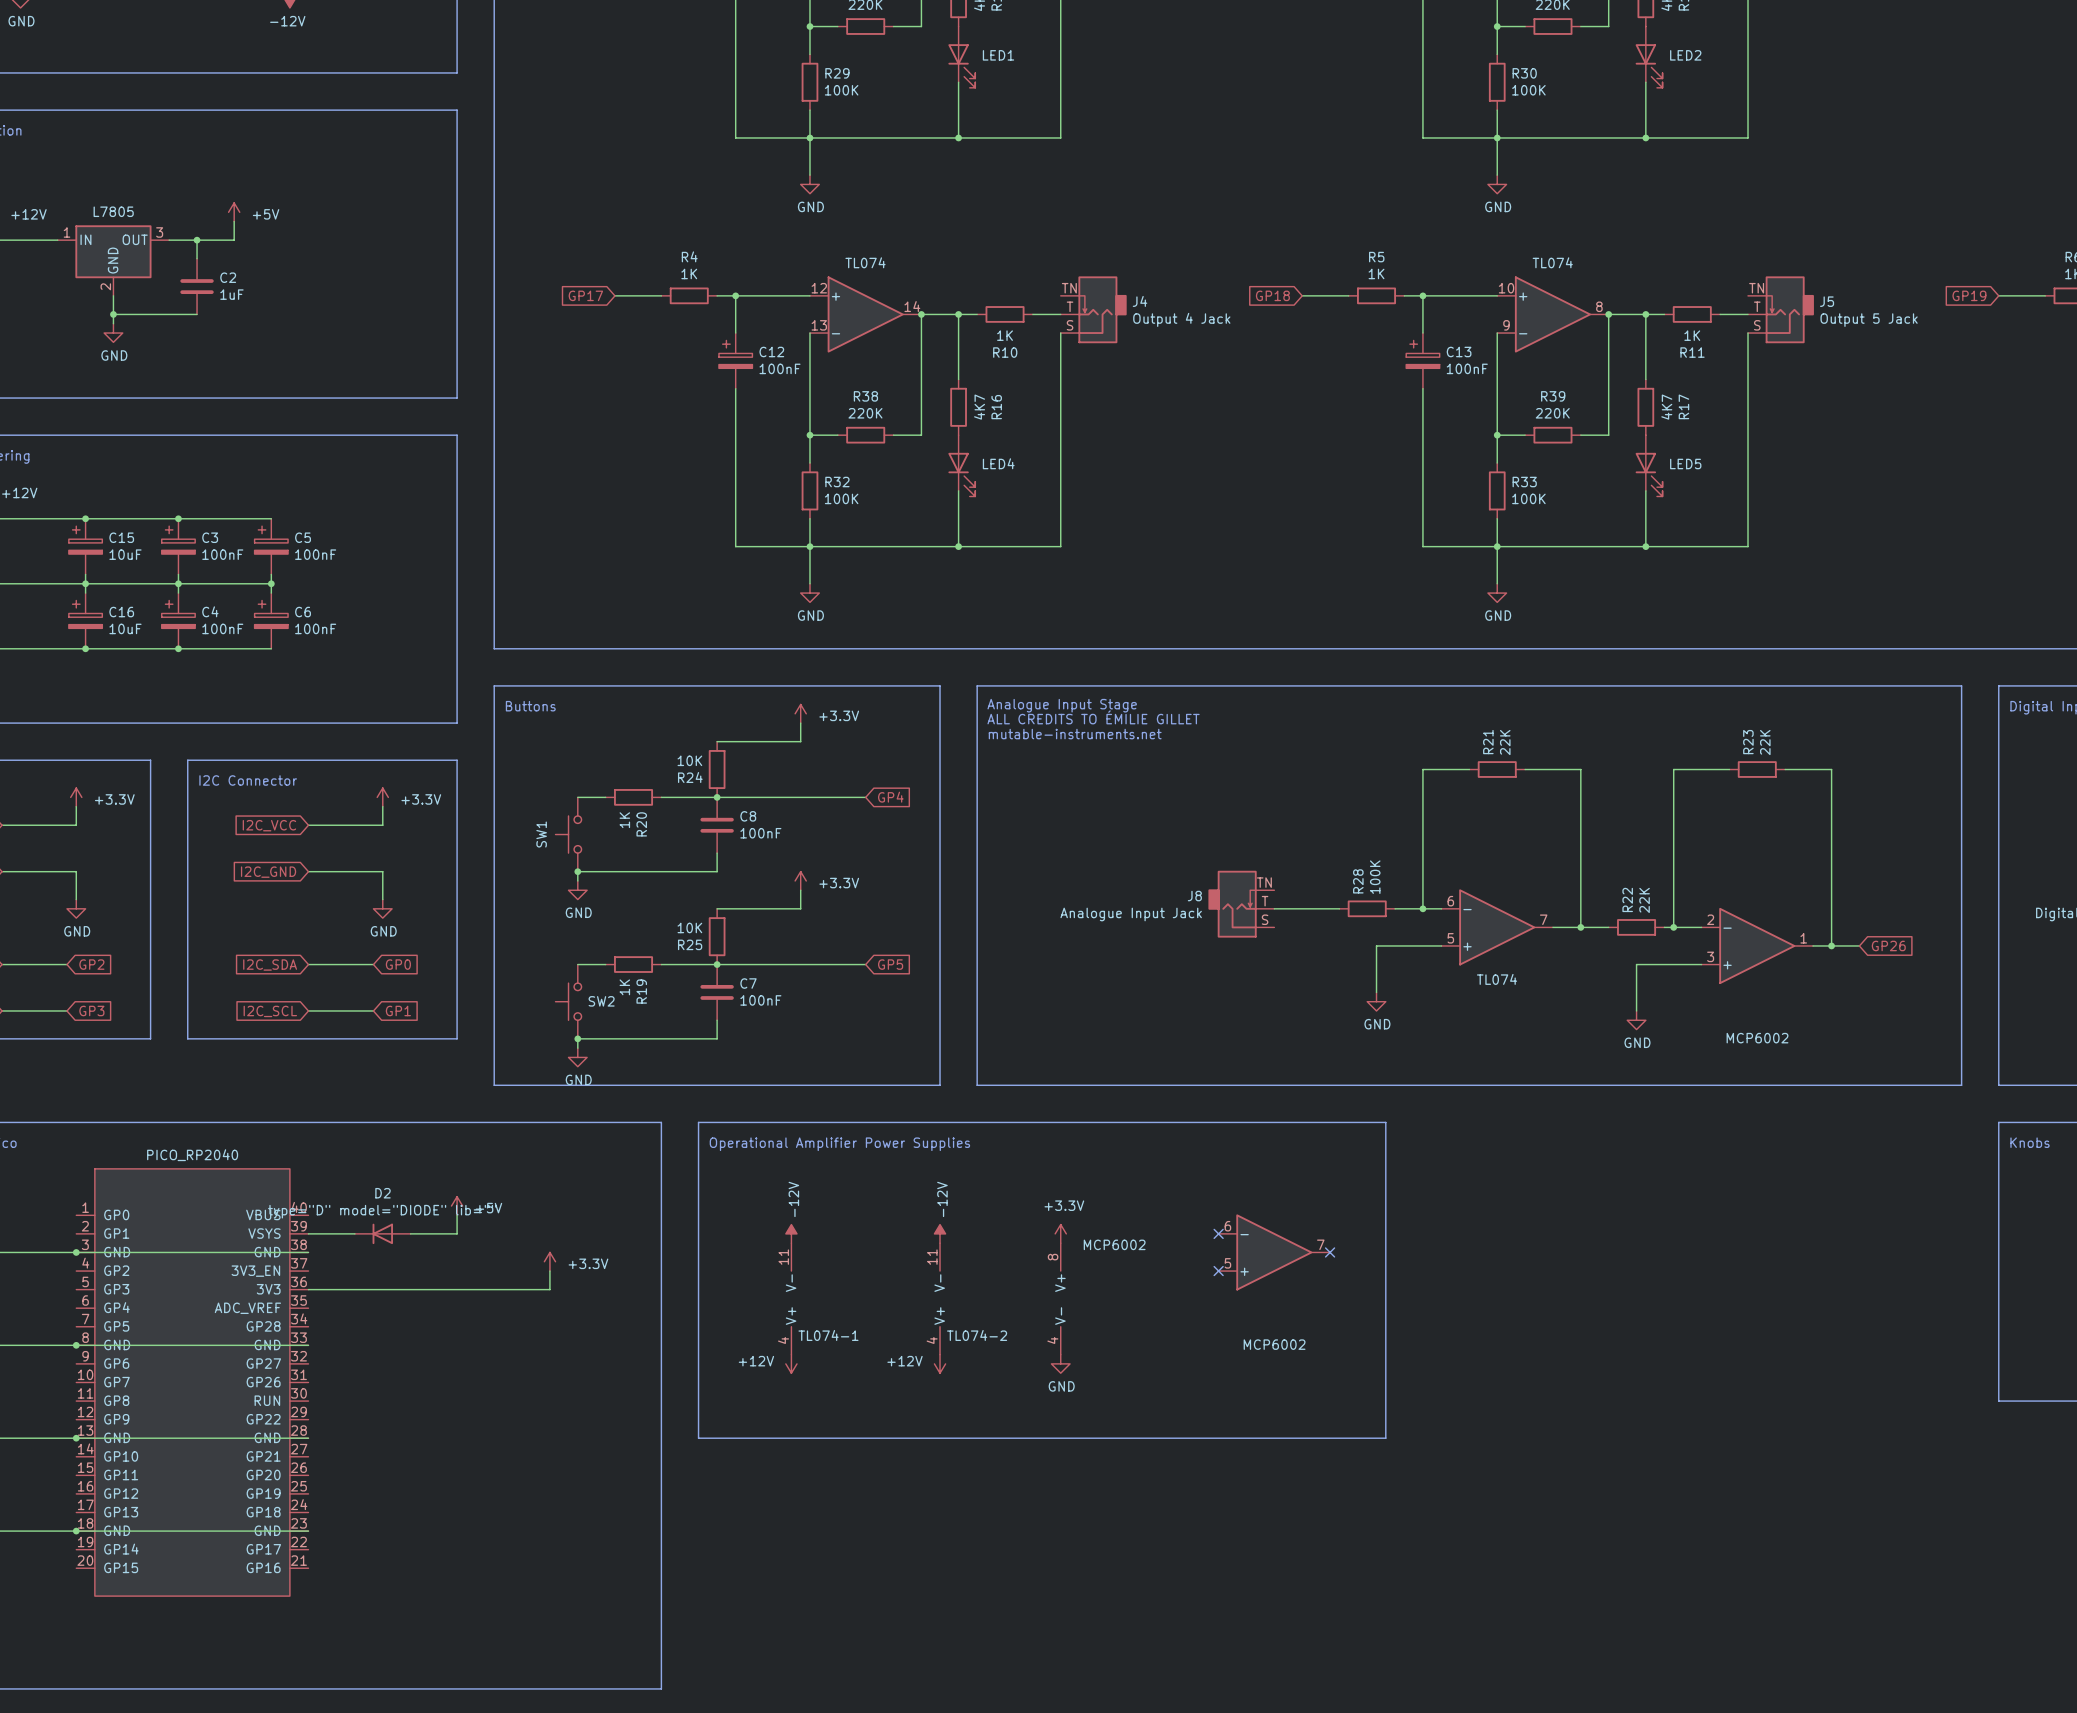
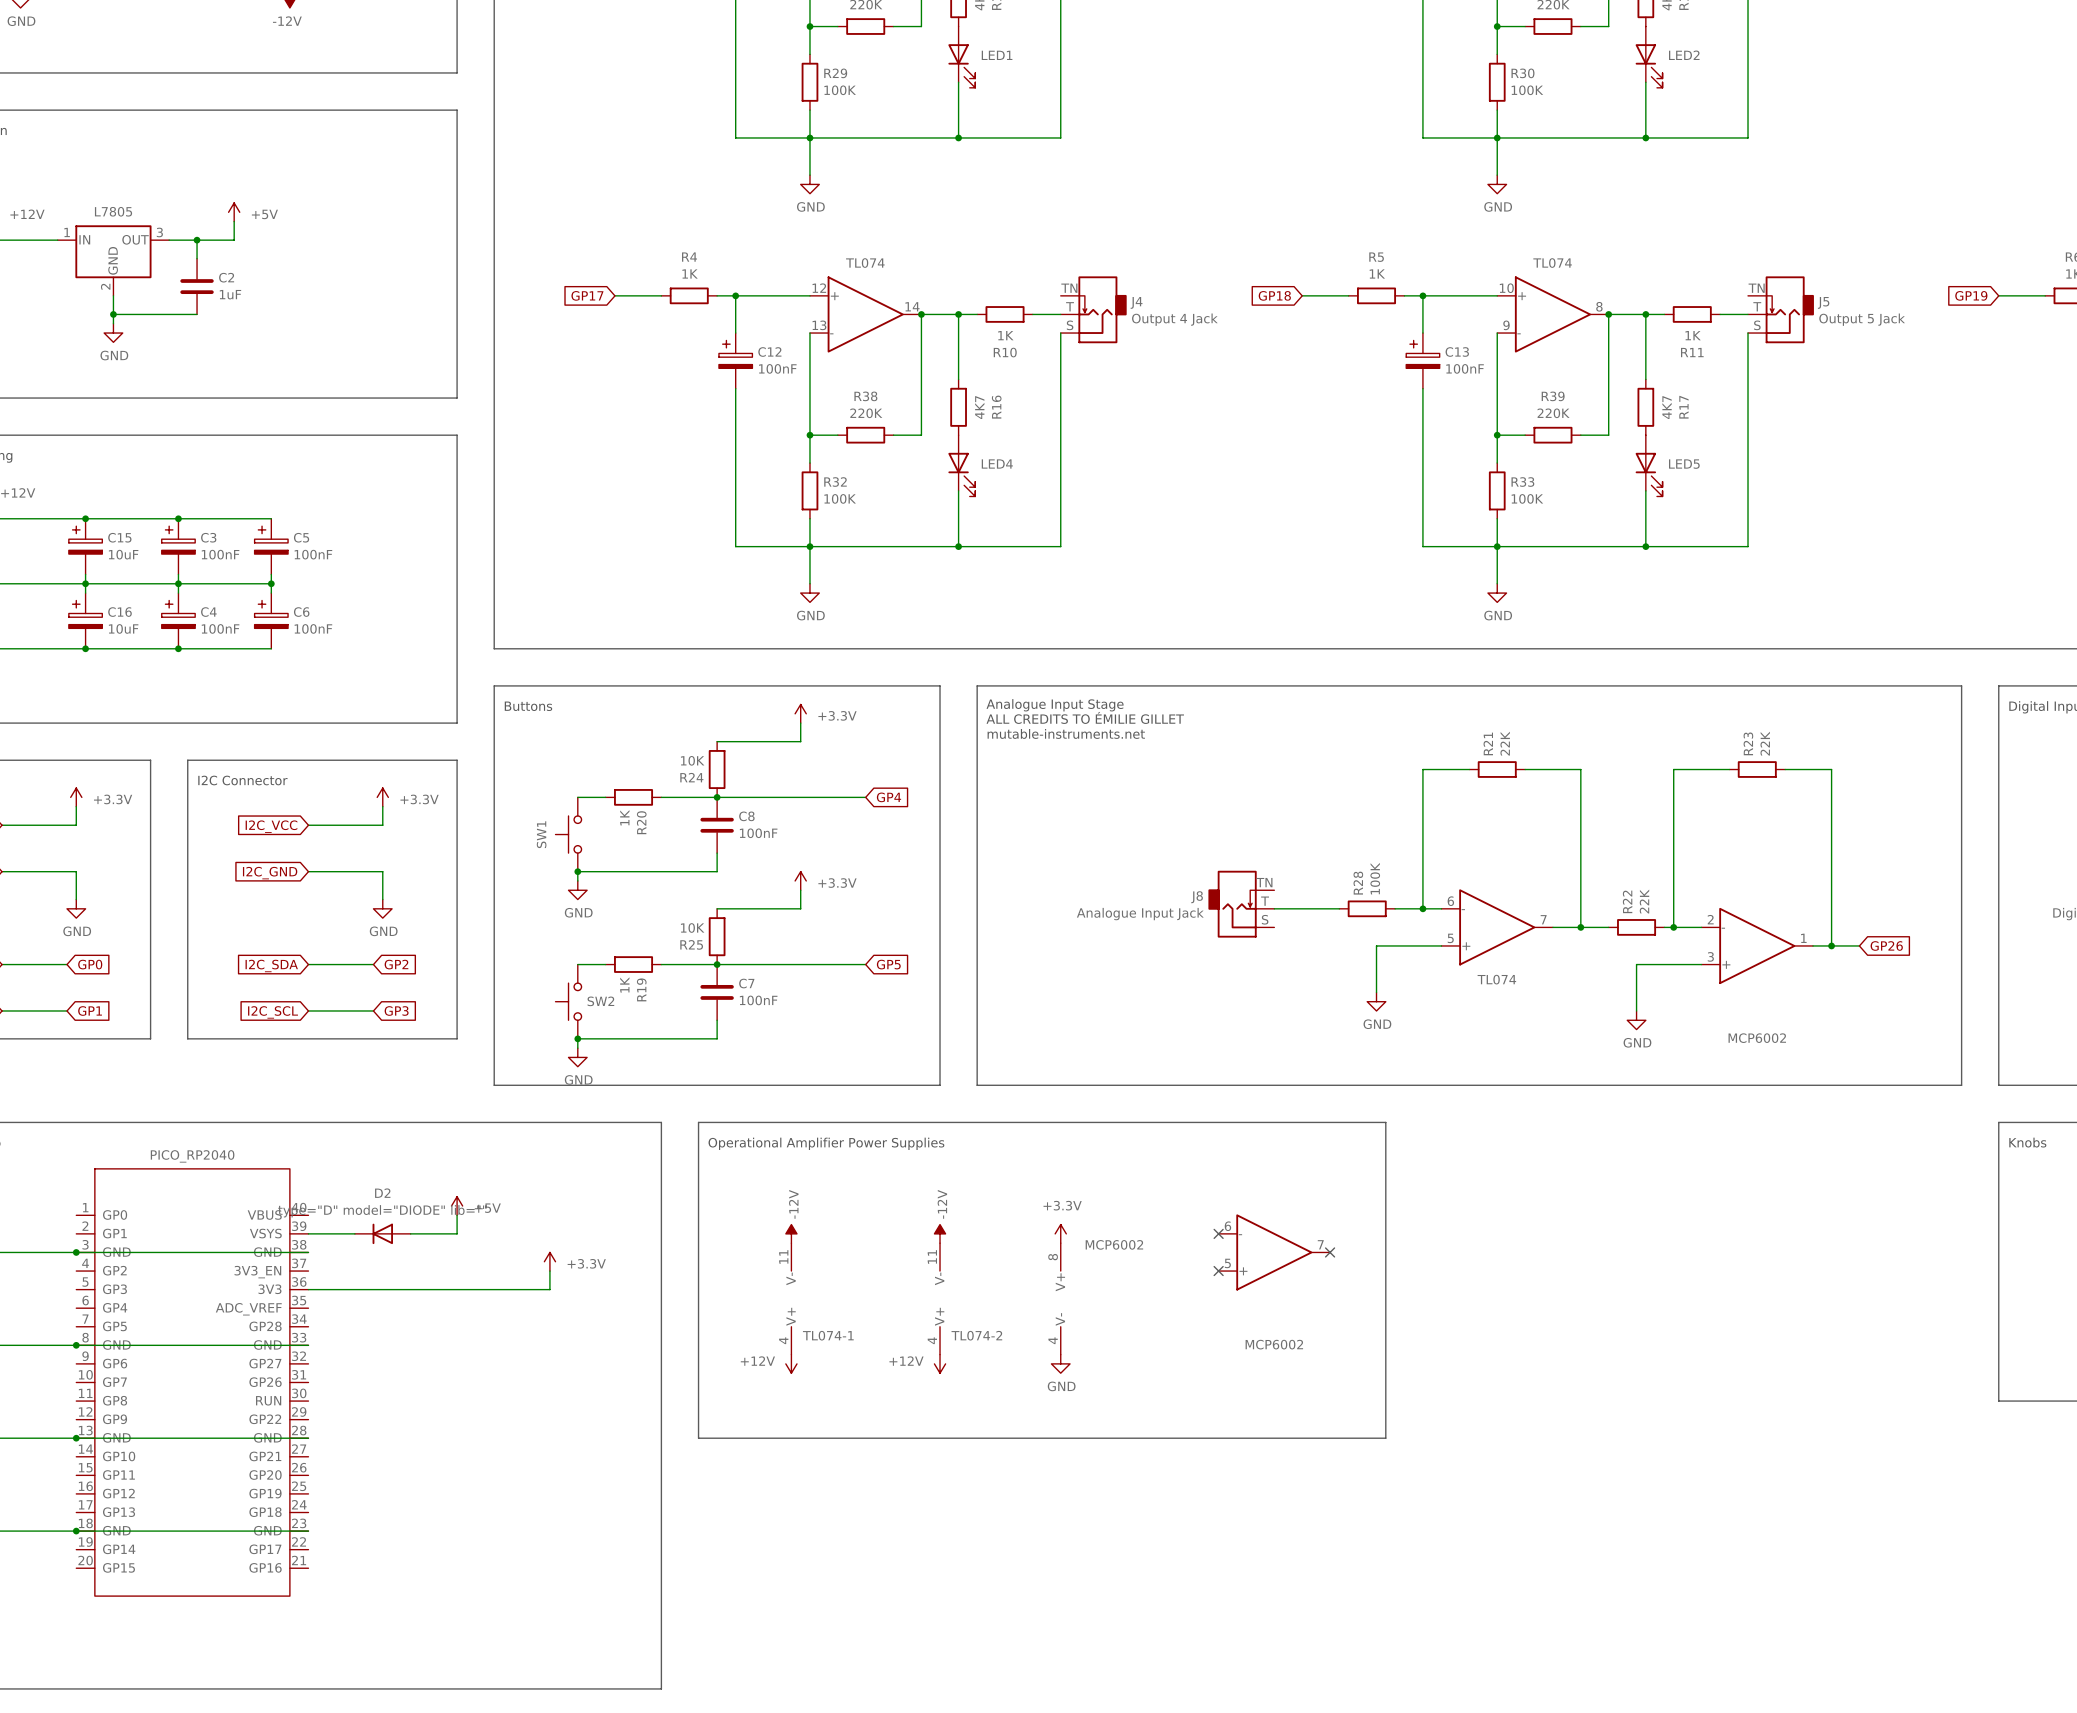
global label: GP2 (91, 964) -> GP0 (90, 964)
global label: GP0 (398, 964) -> GP2 (396, 964)
global label: GP3 (91, 1010) -> GP1 (90, 1011)
global label: GP1 (398, 1010) -> GP3 (396, 1011)

